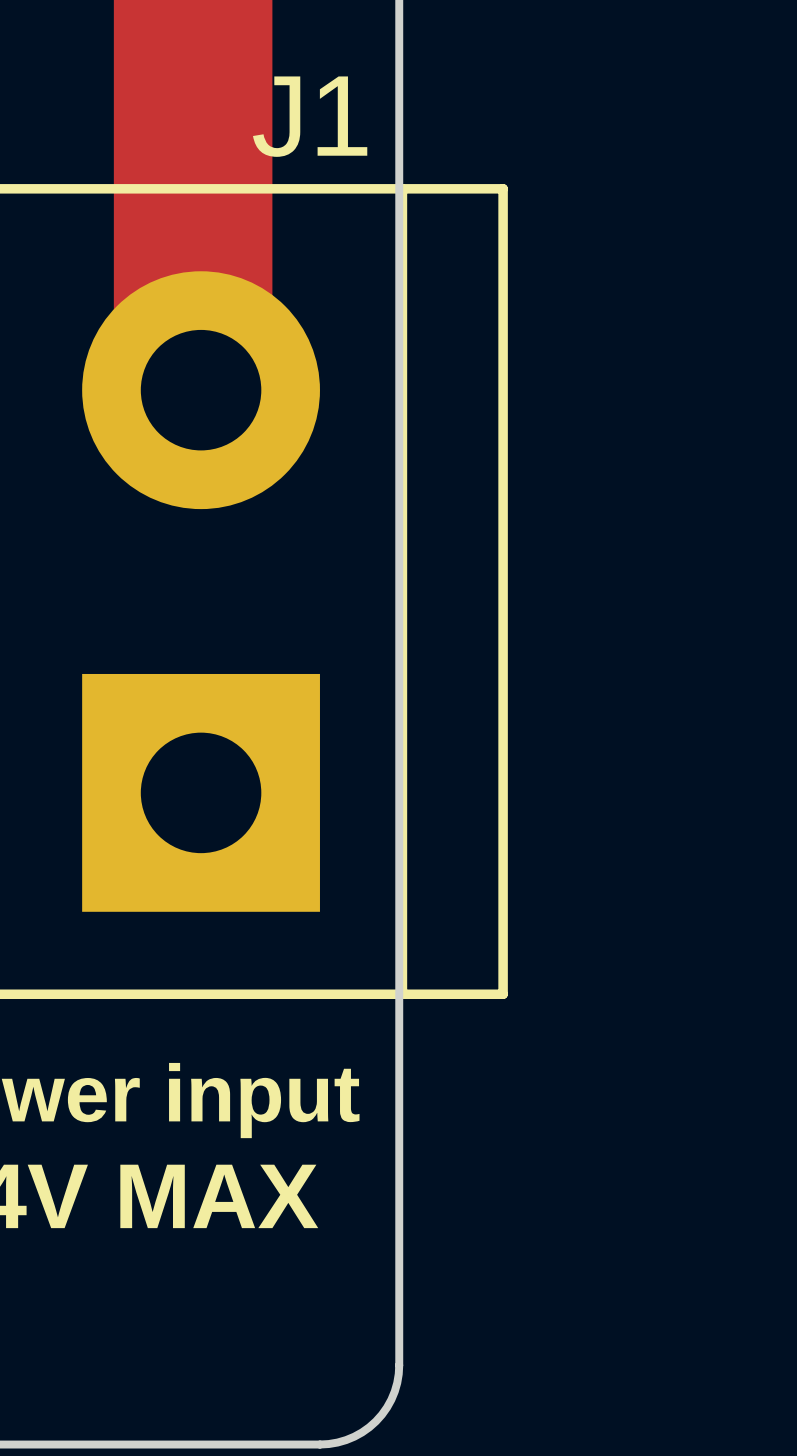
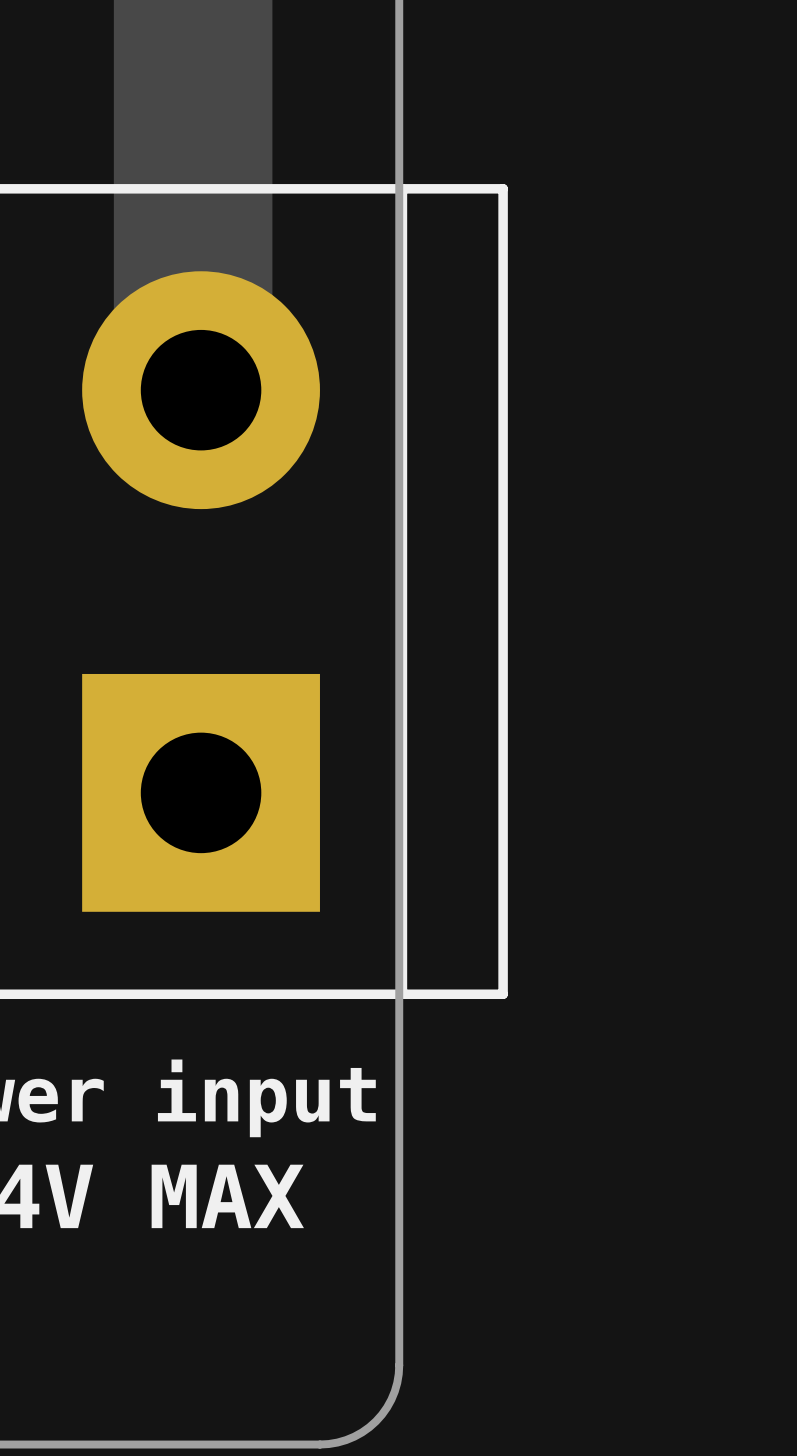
J1 name: J1 (310, 116) -> none

